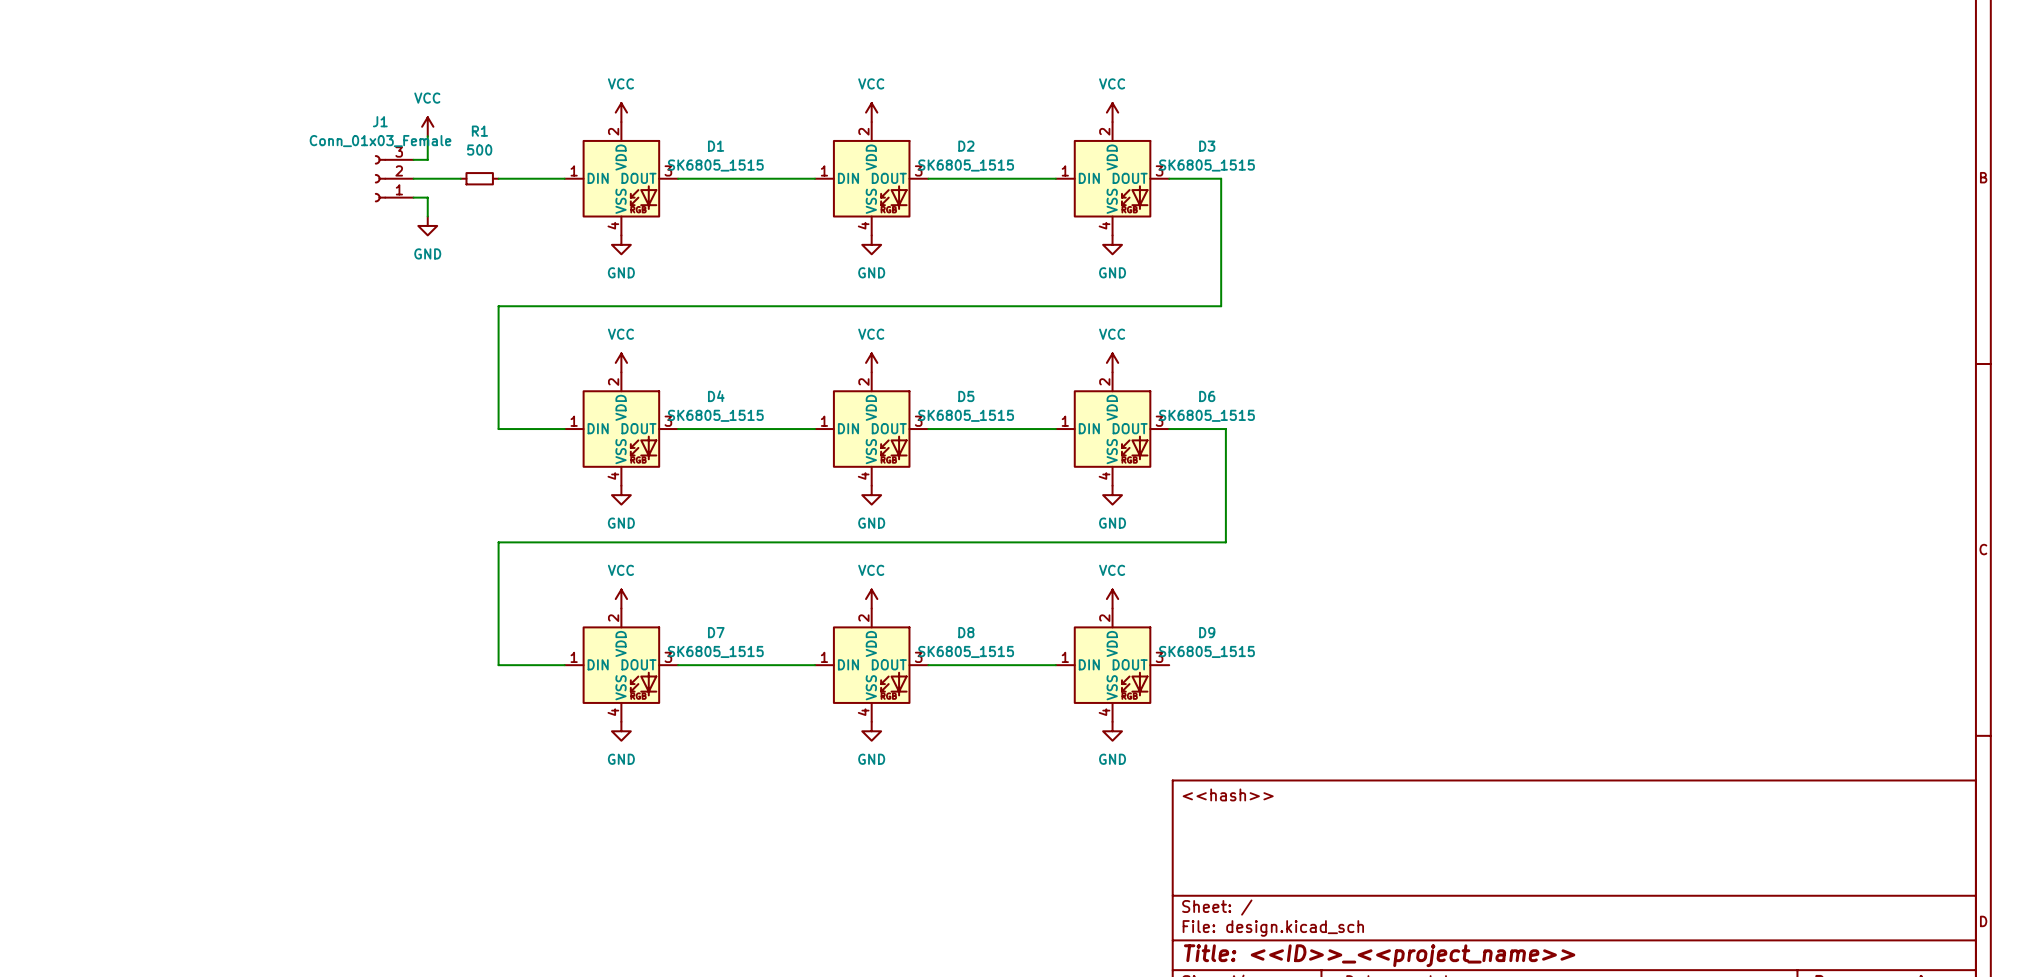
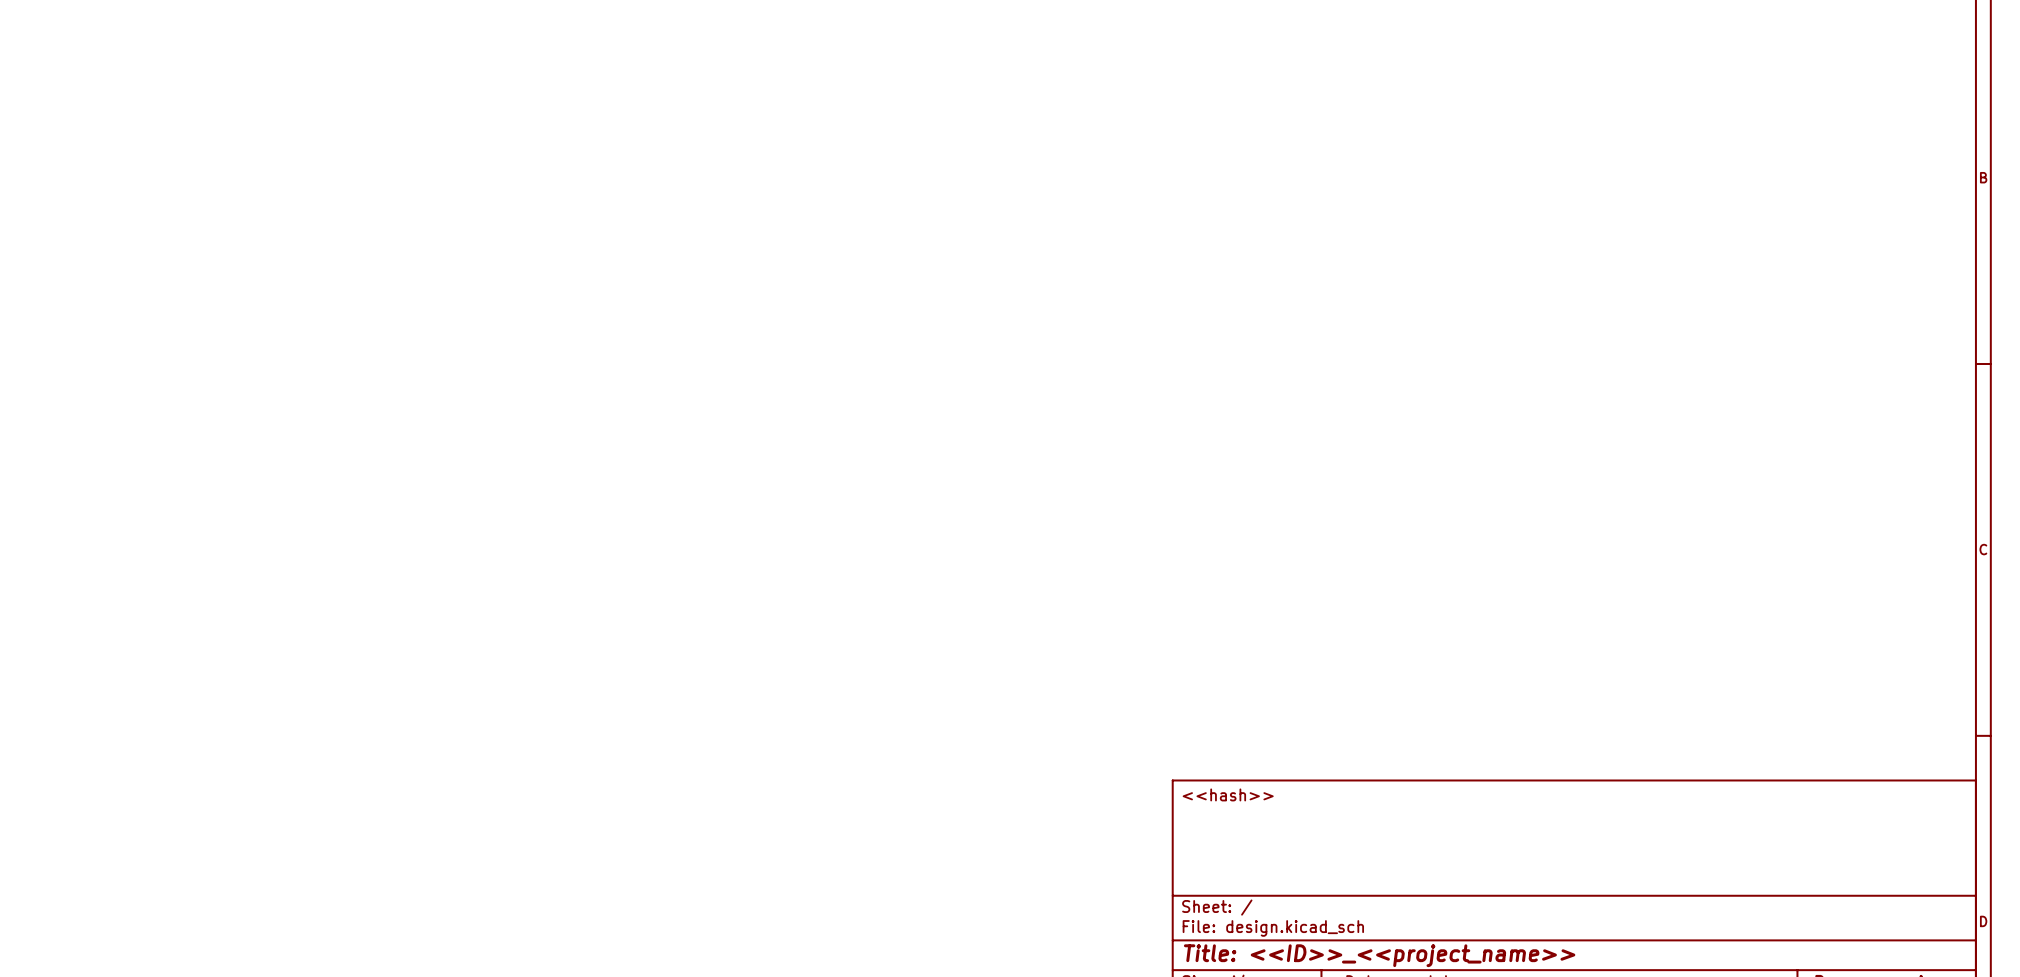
power symbol: VCC (621, 112) -> none
power symbol: VCC (871, 112) -> none
power symbol: VCC (1112, 112) -> none
power symbol: VCC (427, 126) -> none
wire: (427, 136) (427, 159) (413, 159) -> none
J1: Conn_01x03_Female (394, 178) -> none
wire: (413, 178) (460, 178) -> none
R1: 500 (479, 178) -> none
wire: (498, 178) (564, 178) -> none
D1: SK6805_1515 (621, 178) -> none
wire: (678, 178) (815, 178) -> none
D2: SK6805_1515 (871, 178) -> none
wire: (928, 178) (1055, 178) -> none
D3: SK6805_1515 (1112, 178) -> none
wire: (1169, 178) (1221, 178) (1221, 306) (498, 306) (498, 429) (564, 429) -> none
wire: (413, 197) (427, 197) (427, 216) -> none
power symbol: GND (427, 225) -> none
power symbol: GND (621, 244) -> none
power symbol: GND (871, 244) -> none
power symbol: GND (1112, 244) -> none
power symbol: VCC (621, 362) -> none
power symbol: VCC (871, 362) -> none
power symbol: VCC (1112, 362) -> none
D4: SK6805_1515 (621, 429) -> none
wire: (678, 429) (815, 429) -> none
D5: SK6805_1515 (871, 429) -> none
wire: (928, 429) (1055, 429) -> none
D6: SK6805_1515 (1112, 429) -> none
wire: (1169, 429) (1225, 429) (1225, 542) (498, 542) (498, 665) (564, 665) -> none
power symbol: GND (621, 495) -> none
power symbol: GND (871, 495) -> none
power symbol: GND (1112, 495) -> none
power symbol: VCC (621, 599) -> none
power symbol: VCC (871, 599) -> none
power symbol: VCC (1112, 599) -> none
D7: SK6805_1515 (621, 665) -> none
wire: (678, 665) (815, 665) -> none
D8: SK6805_1515 (871, 665) -> none
wire: (928, 665) (1055, 665) -> none
D9: SK6805_1515 (1112, 665) -> none
power symbol: GND (621, 731) -> none
power symbol: GND (871, 731) -> none
power symbol: GND (1112, 731) -> none

